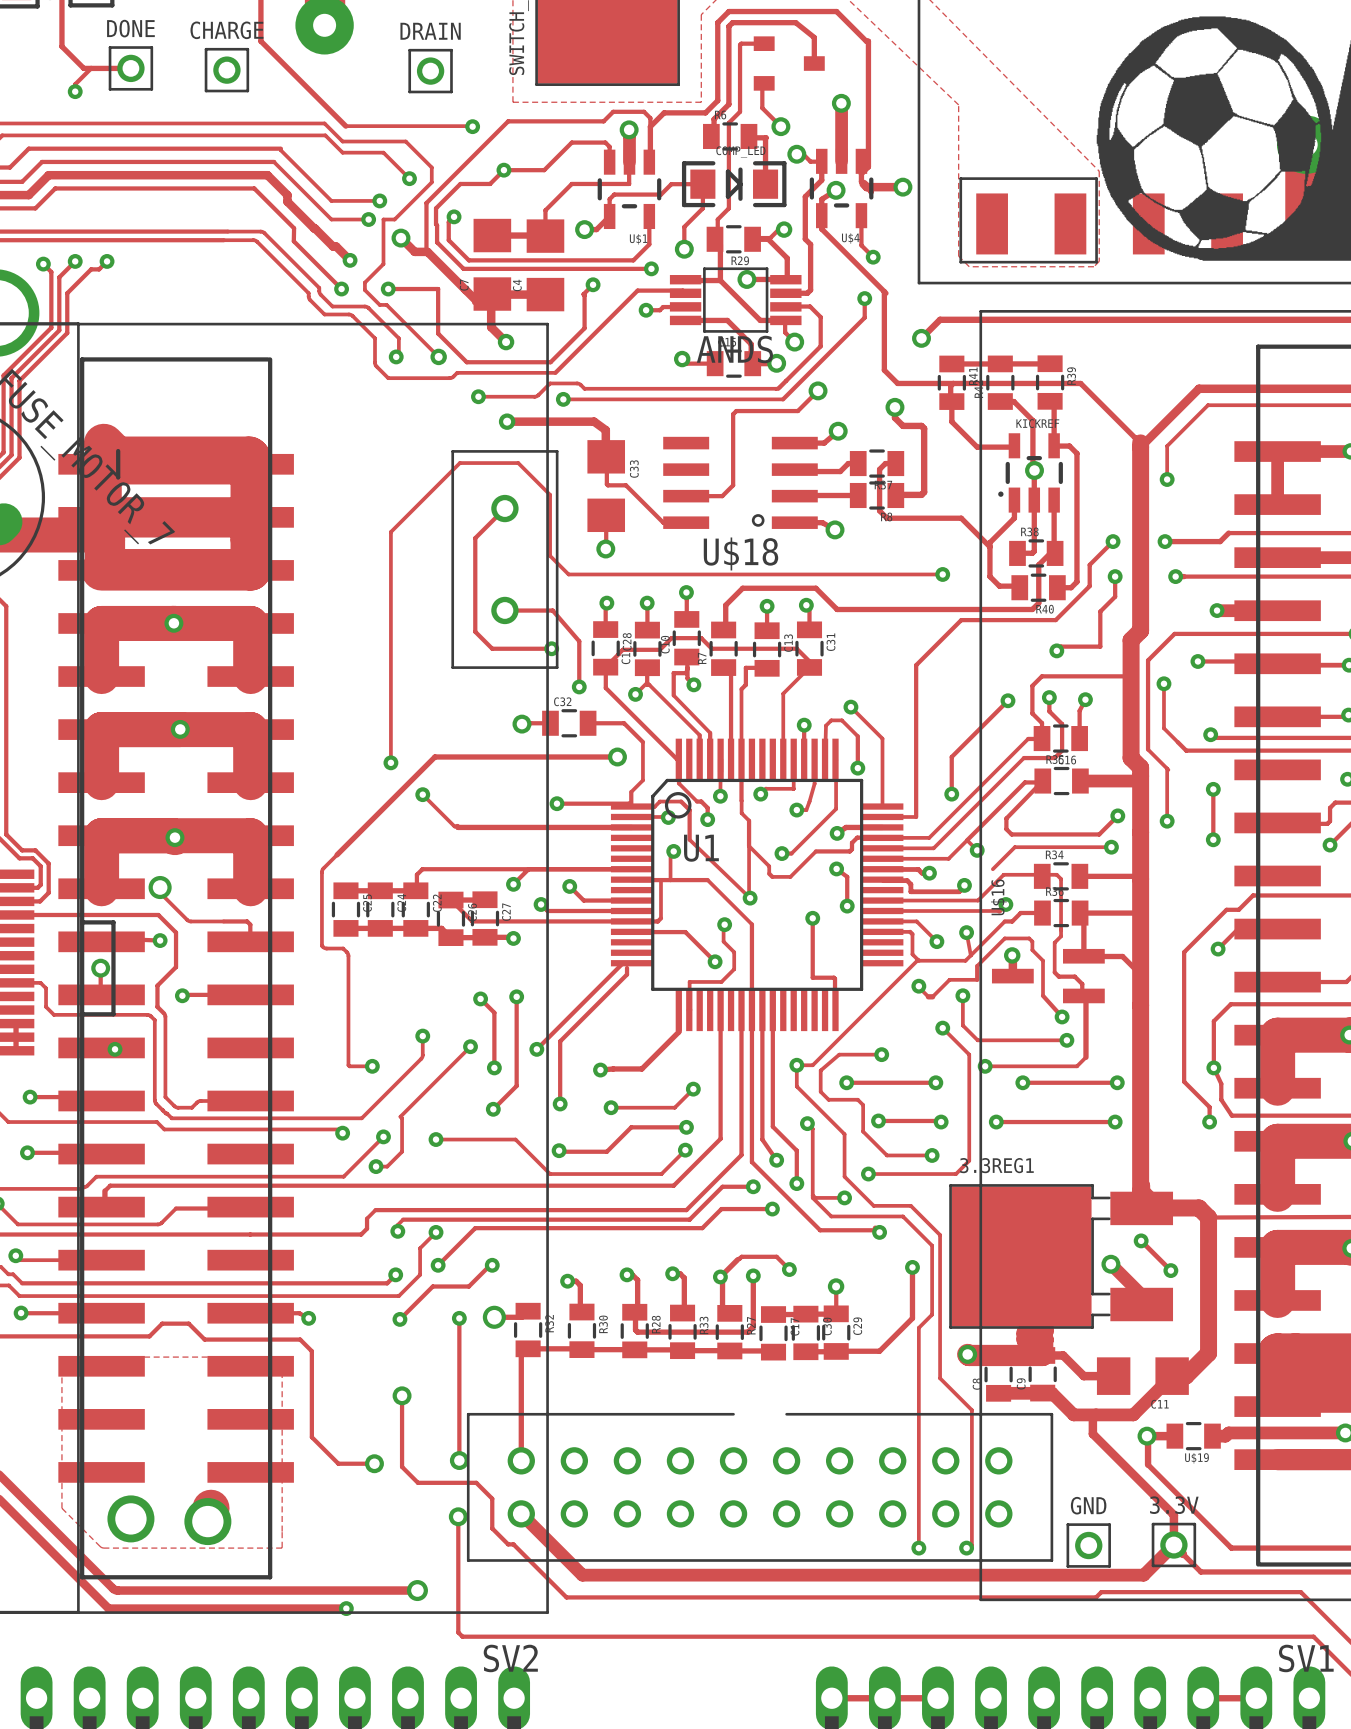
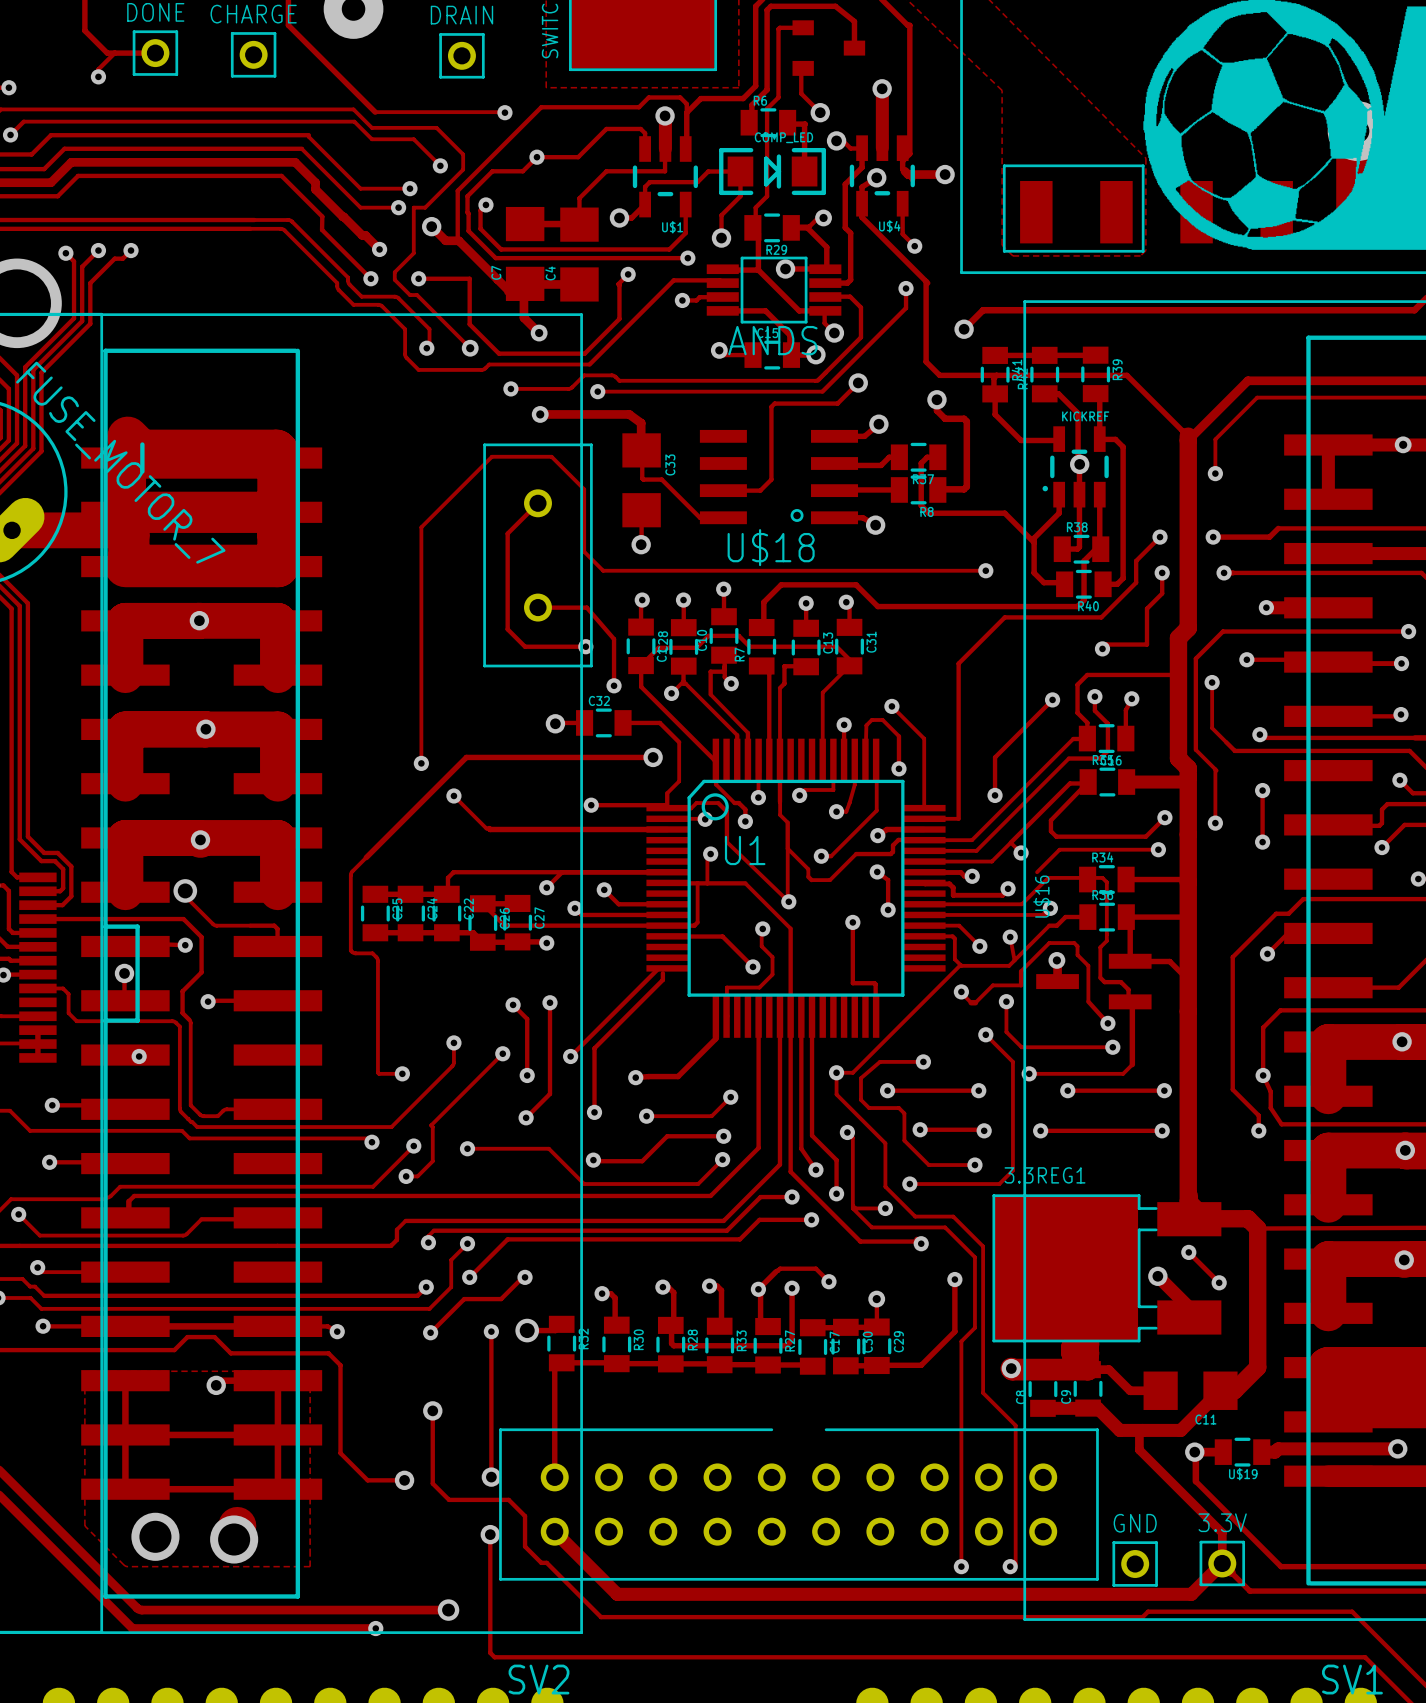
track: none -> (125, 1326) (277, 1326)
track: none -> (125, 1380) (125, 1489) (277, 1489) (277, 1380) (217, 1380) (216, 1385)
via: none -> (216, 1385)
track: none -> (125, 1434) (274, 1434) (277, 1438)

